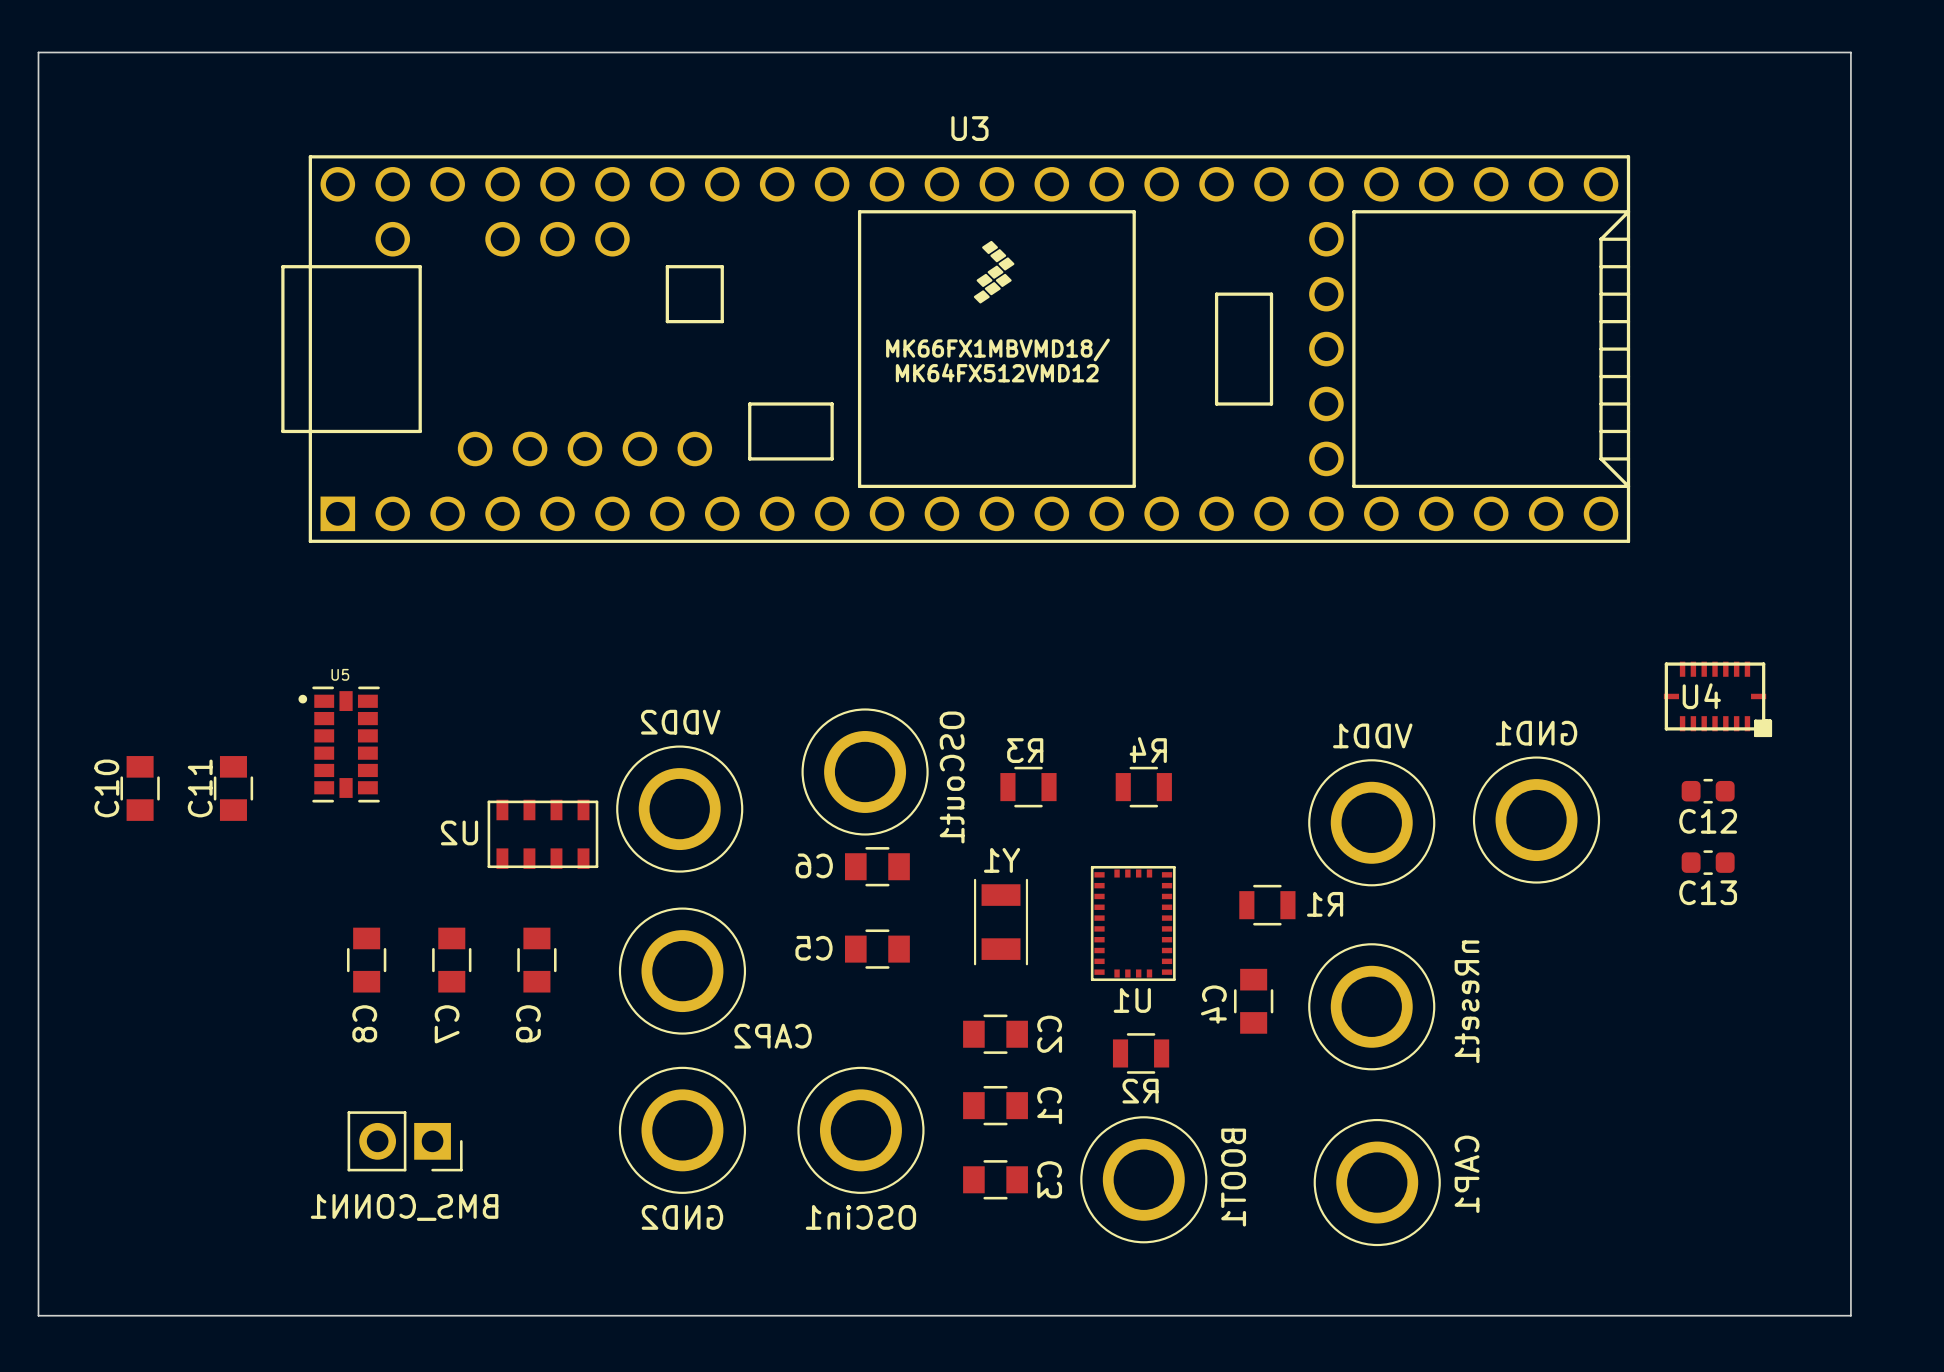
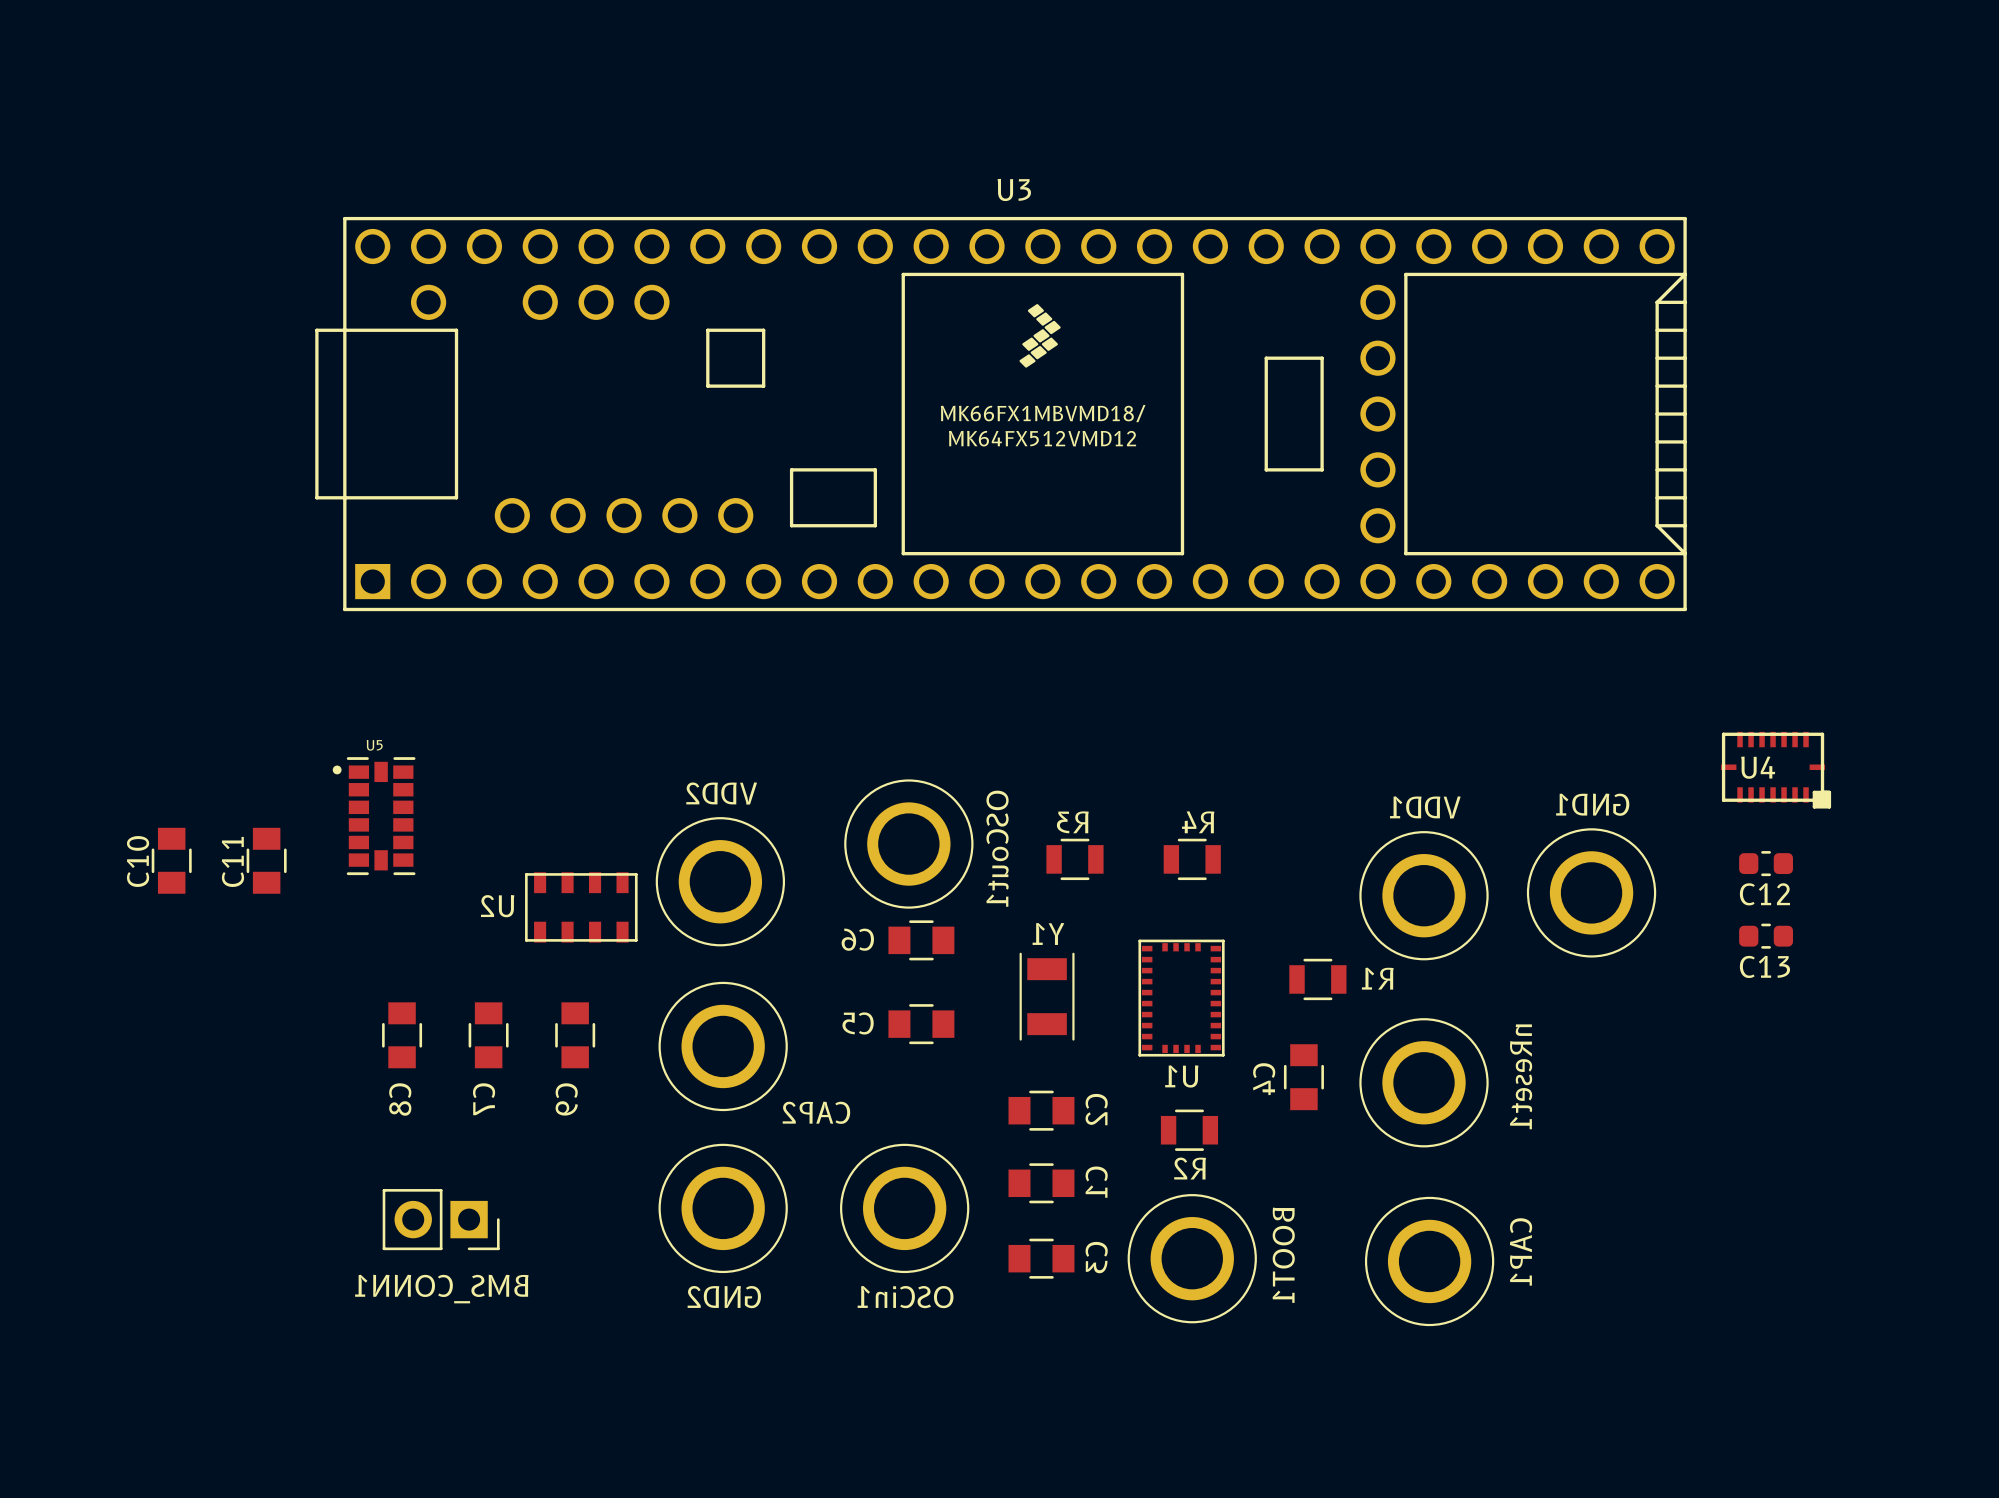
board edge: (38, 52) (38, 1315) (1850, 1315) (1850, 52) (38, 52) -> none

